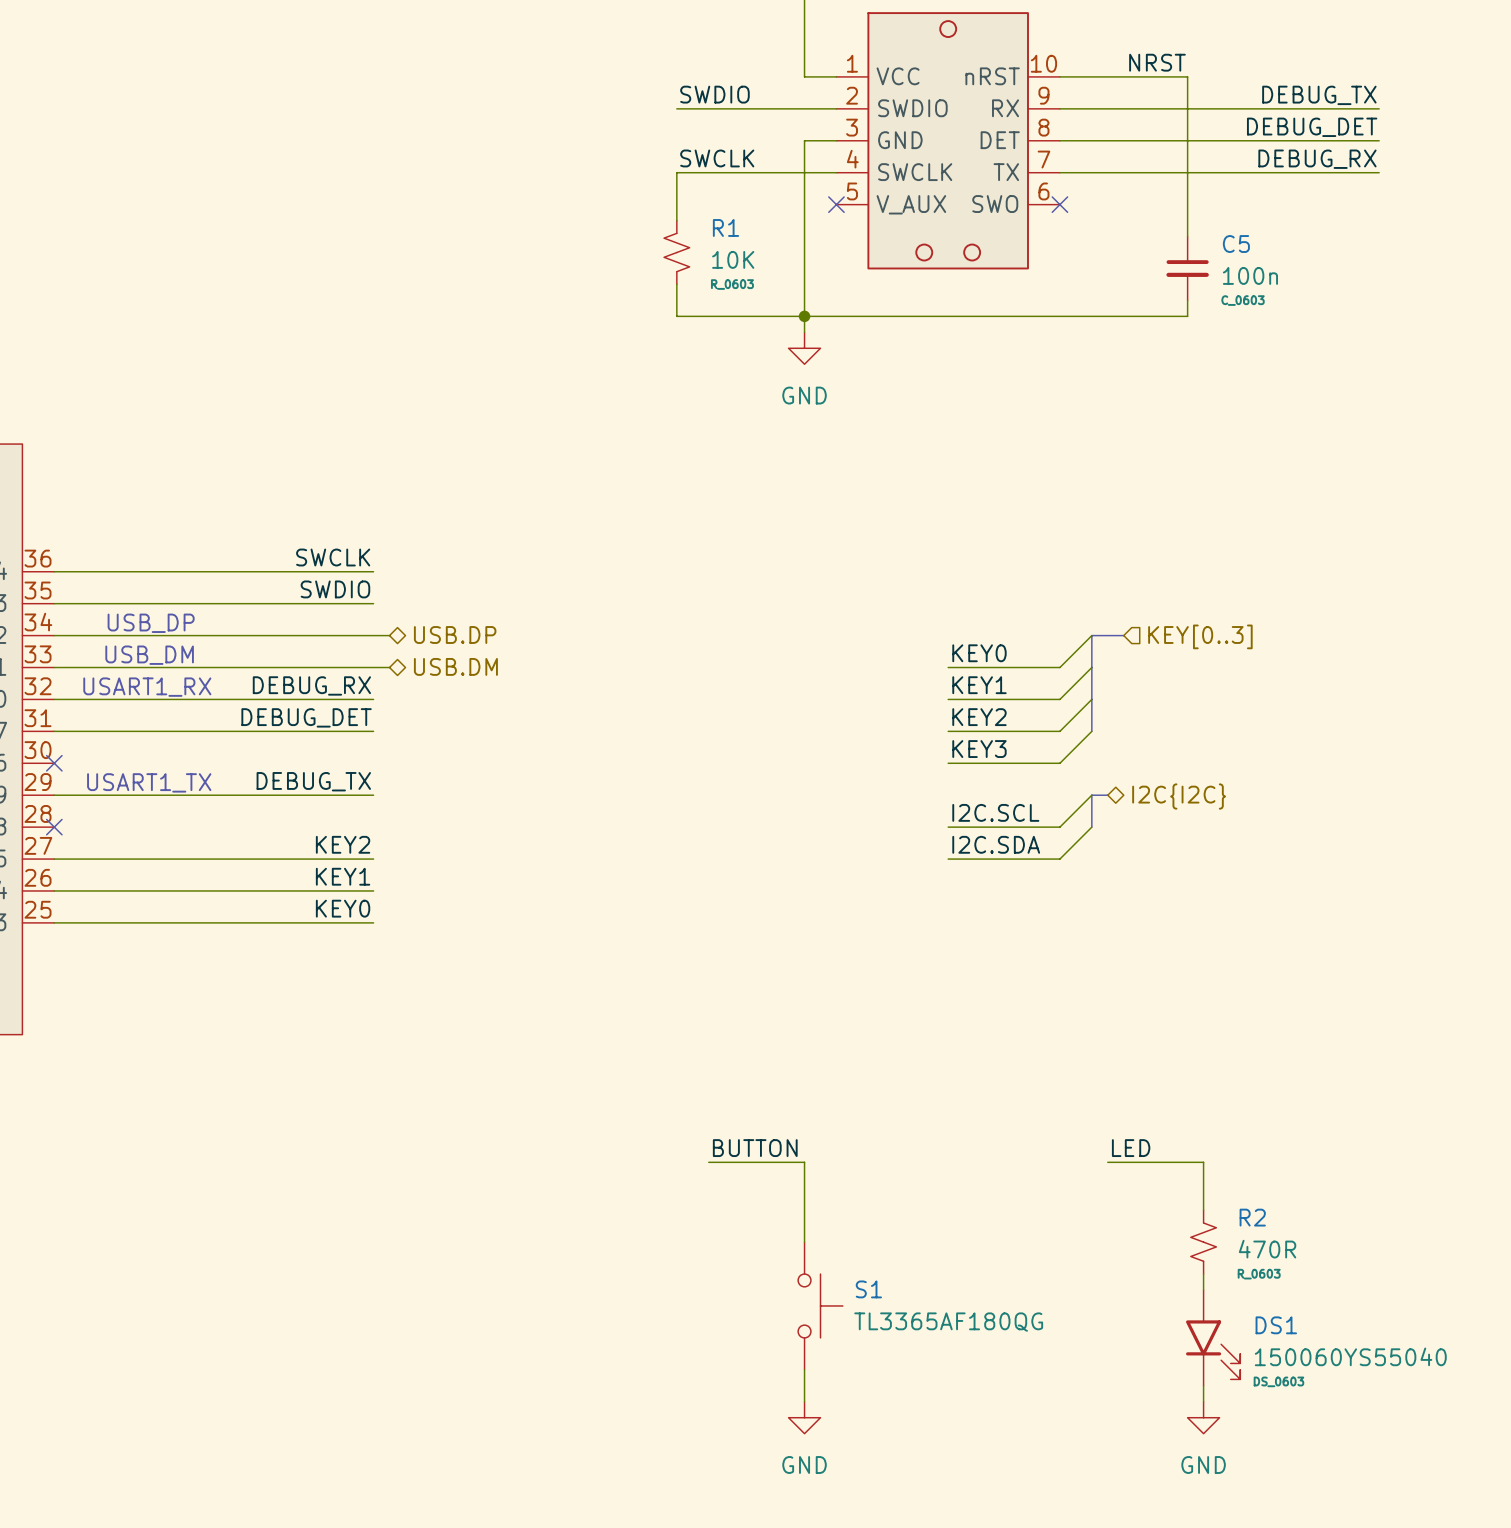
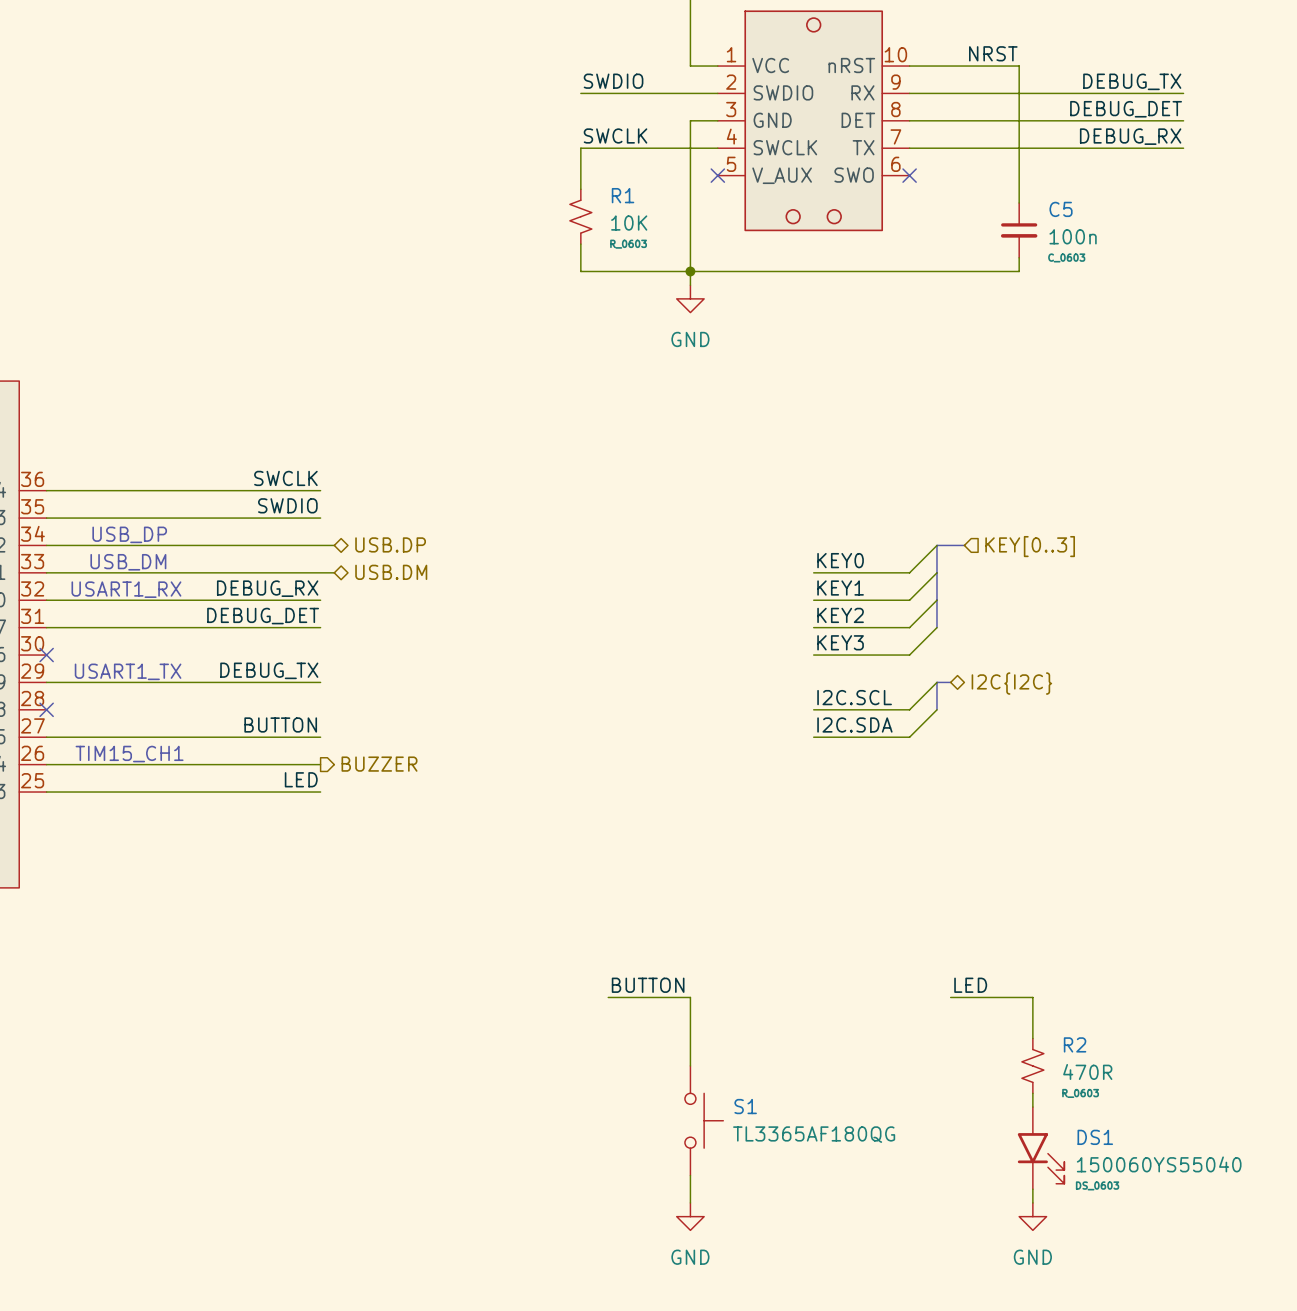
label: KEY2 (343, 844) -> BUTTON (280, 724)
label: KEY1 (343, 876) -> none
text: none -> TIM15_CH1 (129, 754)
hierarchical label: none -> BUZZER (379, 764)
label: KEY0 (343, 908) -> LED (301, 779)

